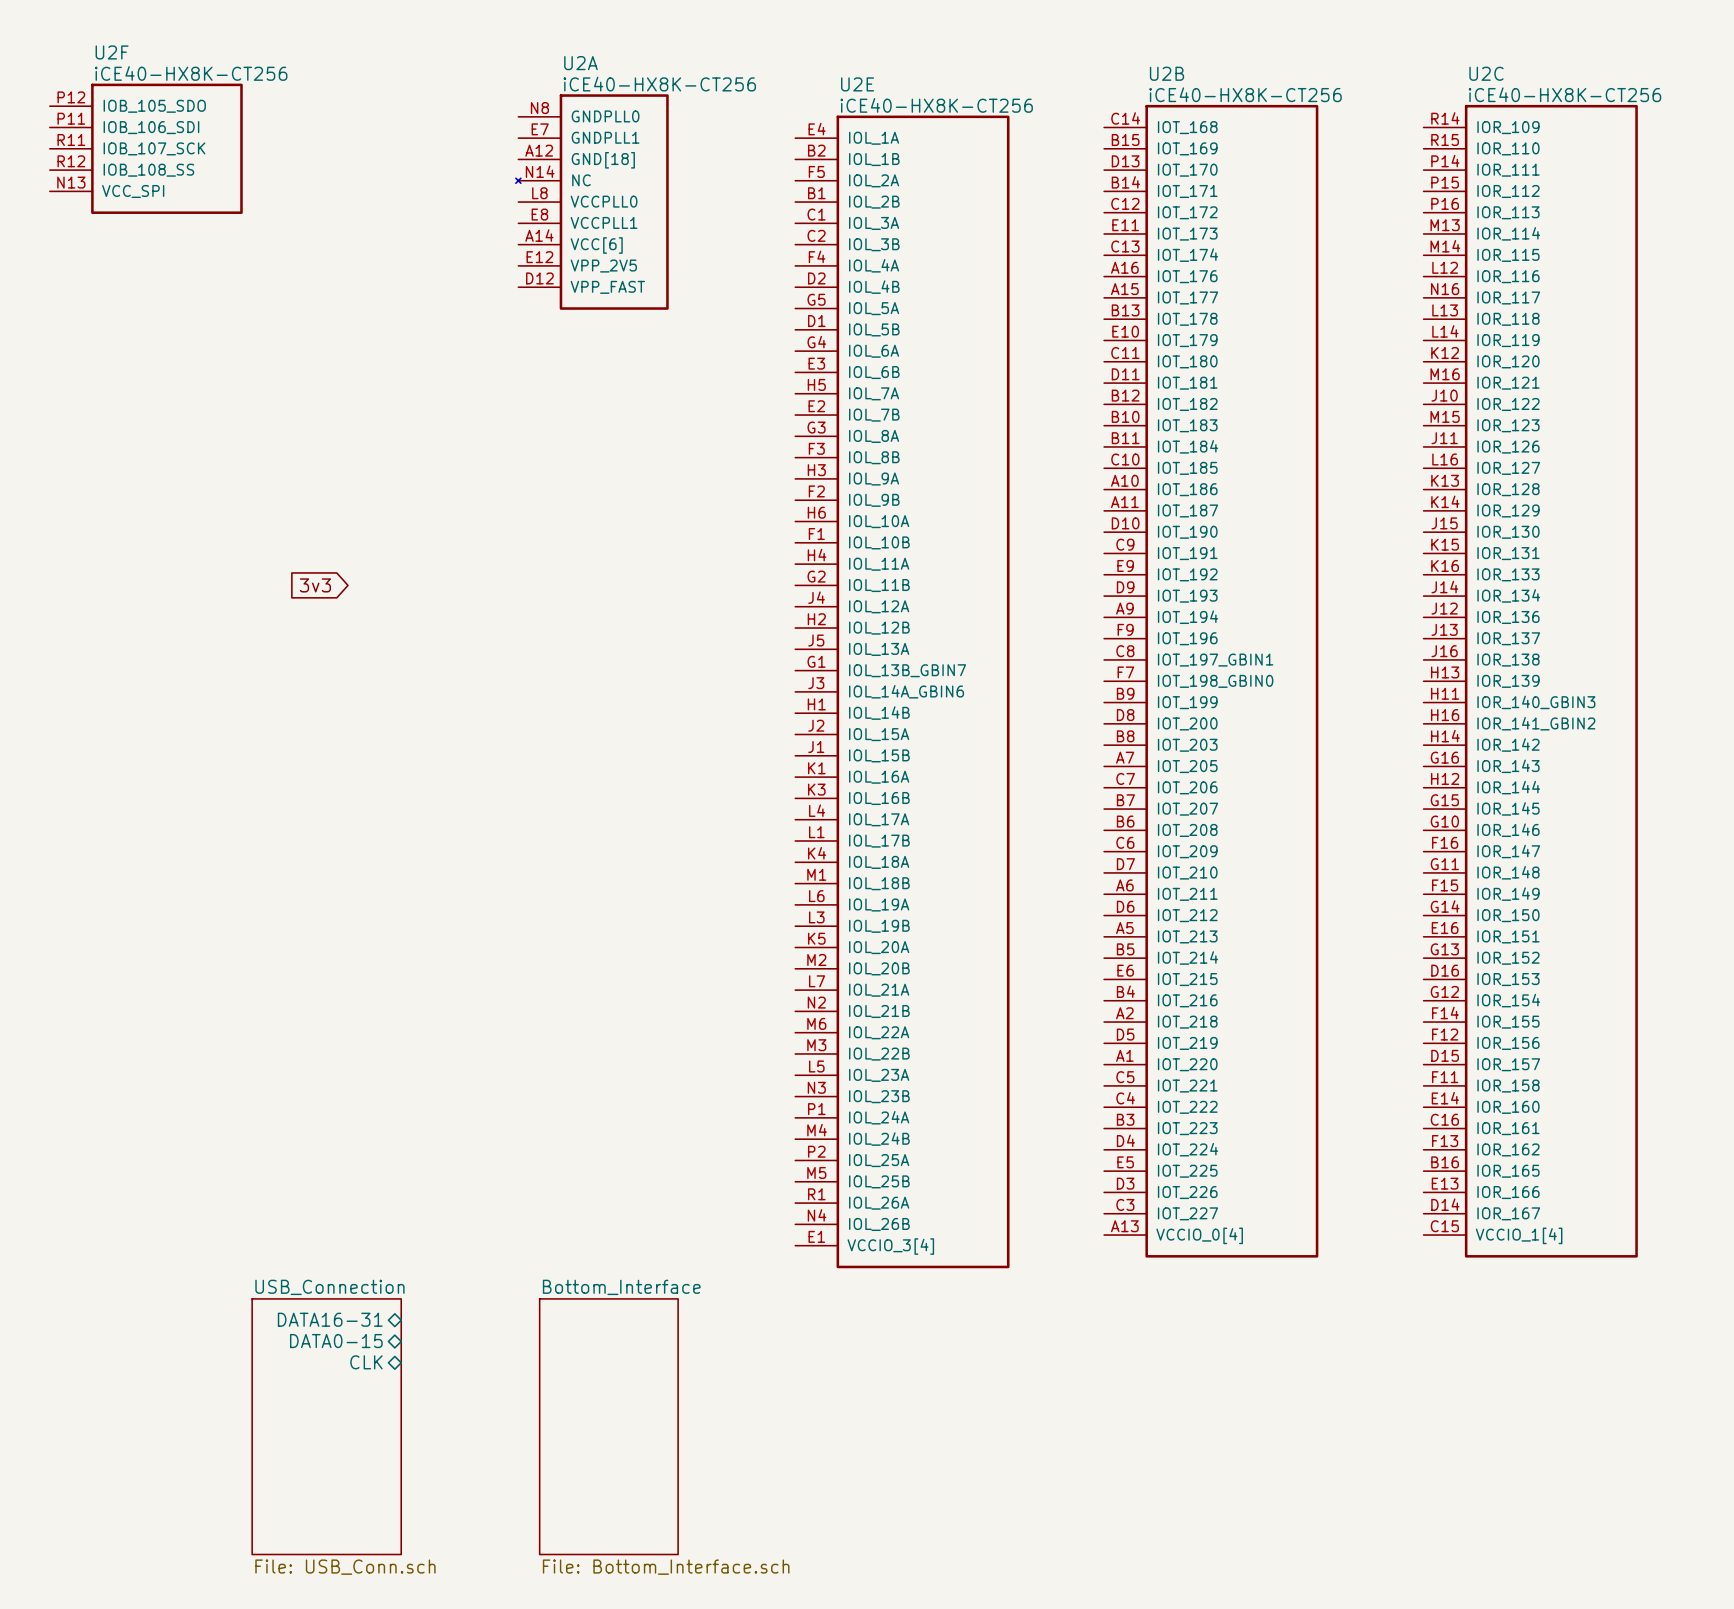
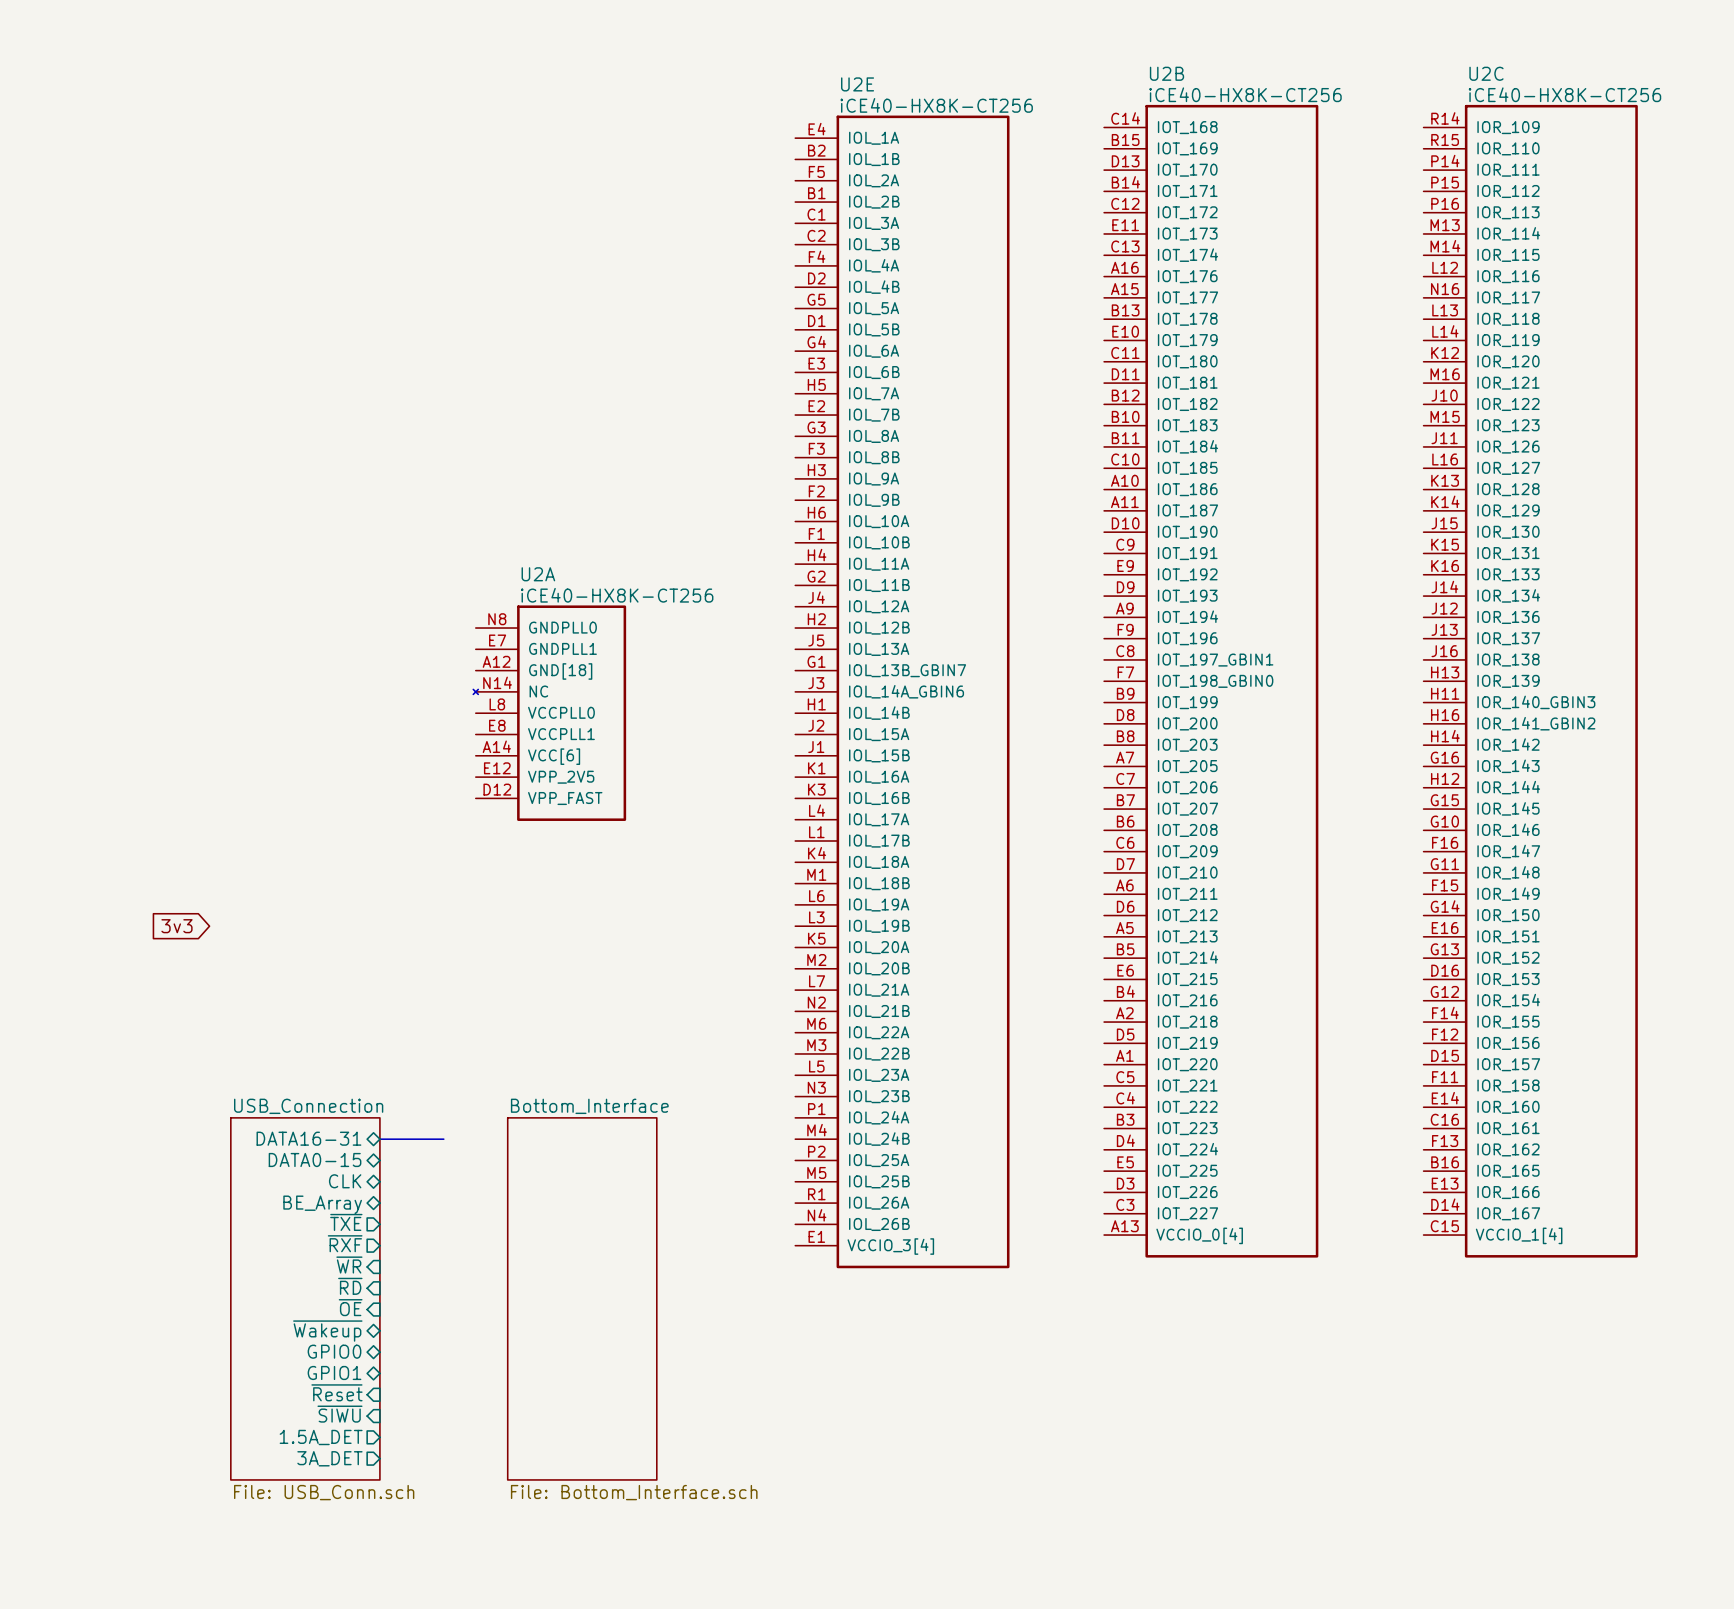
U2F: iCE40-HX8K-CT256 (146, 148) -> none
U2A position: (592, 202) -> (549, 713)
global label: 3v3 (315, 585) -> none
global label: none -> 3v3 (176, 926)
bus: none -> (379, 1139) (443, 1139)
sheet pin: none -> BE_Array (322, 1204)
sheet pin: none -> ~{TXE} (346, 1222)
sheet pin: none -> ~{RXF} (345, 1243)
sheet pin: none -> ~{WR} (349, 1265)
sheet pin: none -> ~{RD} (350, 1286)
sheet USB_Connection: none -> File: USB_Conn.sch (305, 1298)
sheet Bottom_Interface: none -> File: Bottom_Interface.sch (582, 1298)
sheet pin: none -> ~{OE} (350, 1307)
sheet pin position: DATA16-31 (330, 1319) -> DATA16-31 (308, 1138)
sheet pin: none -> ~{Wakeup} (327, 1331)
sheet pin position: DATA0-15 (336, 1341) -> DATA0-15 (315, 1160)
sheet pin: none -> GPIO0 (334, 1351)
sheet pin position: CLK (366, 1362) -> CLK (345, 1181)
sheet pin: none -> GPIO1 (334, 1372)
sheet pin: none -> ~{Reset} (336, 1392)
sheet pin: none -> ~{SIWU} (339, 1414)
sheet USB_Connection: File: USB_Conn.sch (326, 1426) -> none
sheet Bottom_Interface: File: Bottom_Interface.sch (608, 1426) -> none
sheet pin: none -> 1.5A_DET (321, 1437)
sheet pin: none -> 3A_DET (329, 1458)

